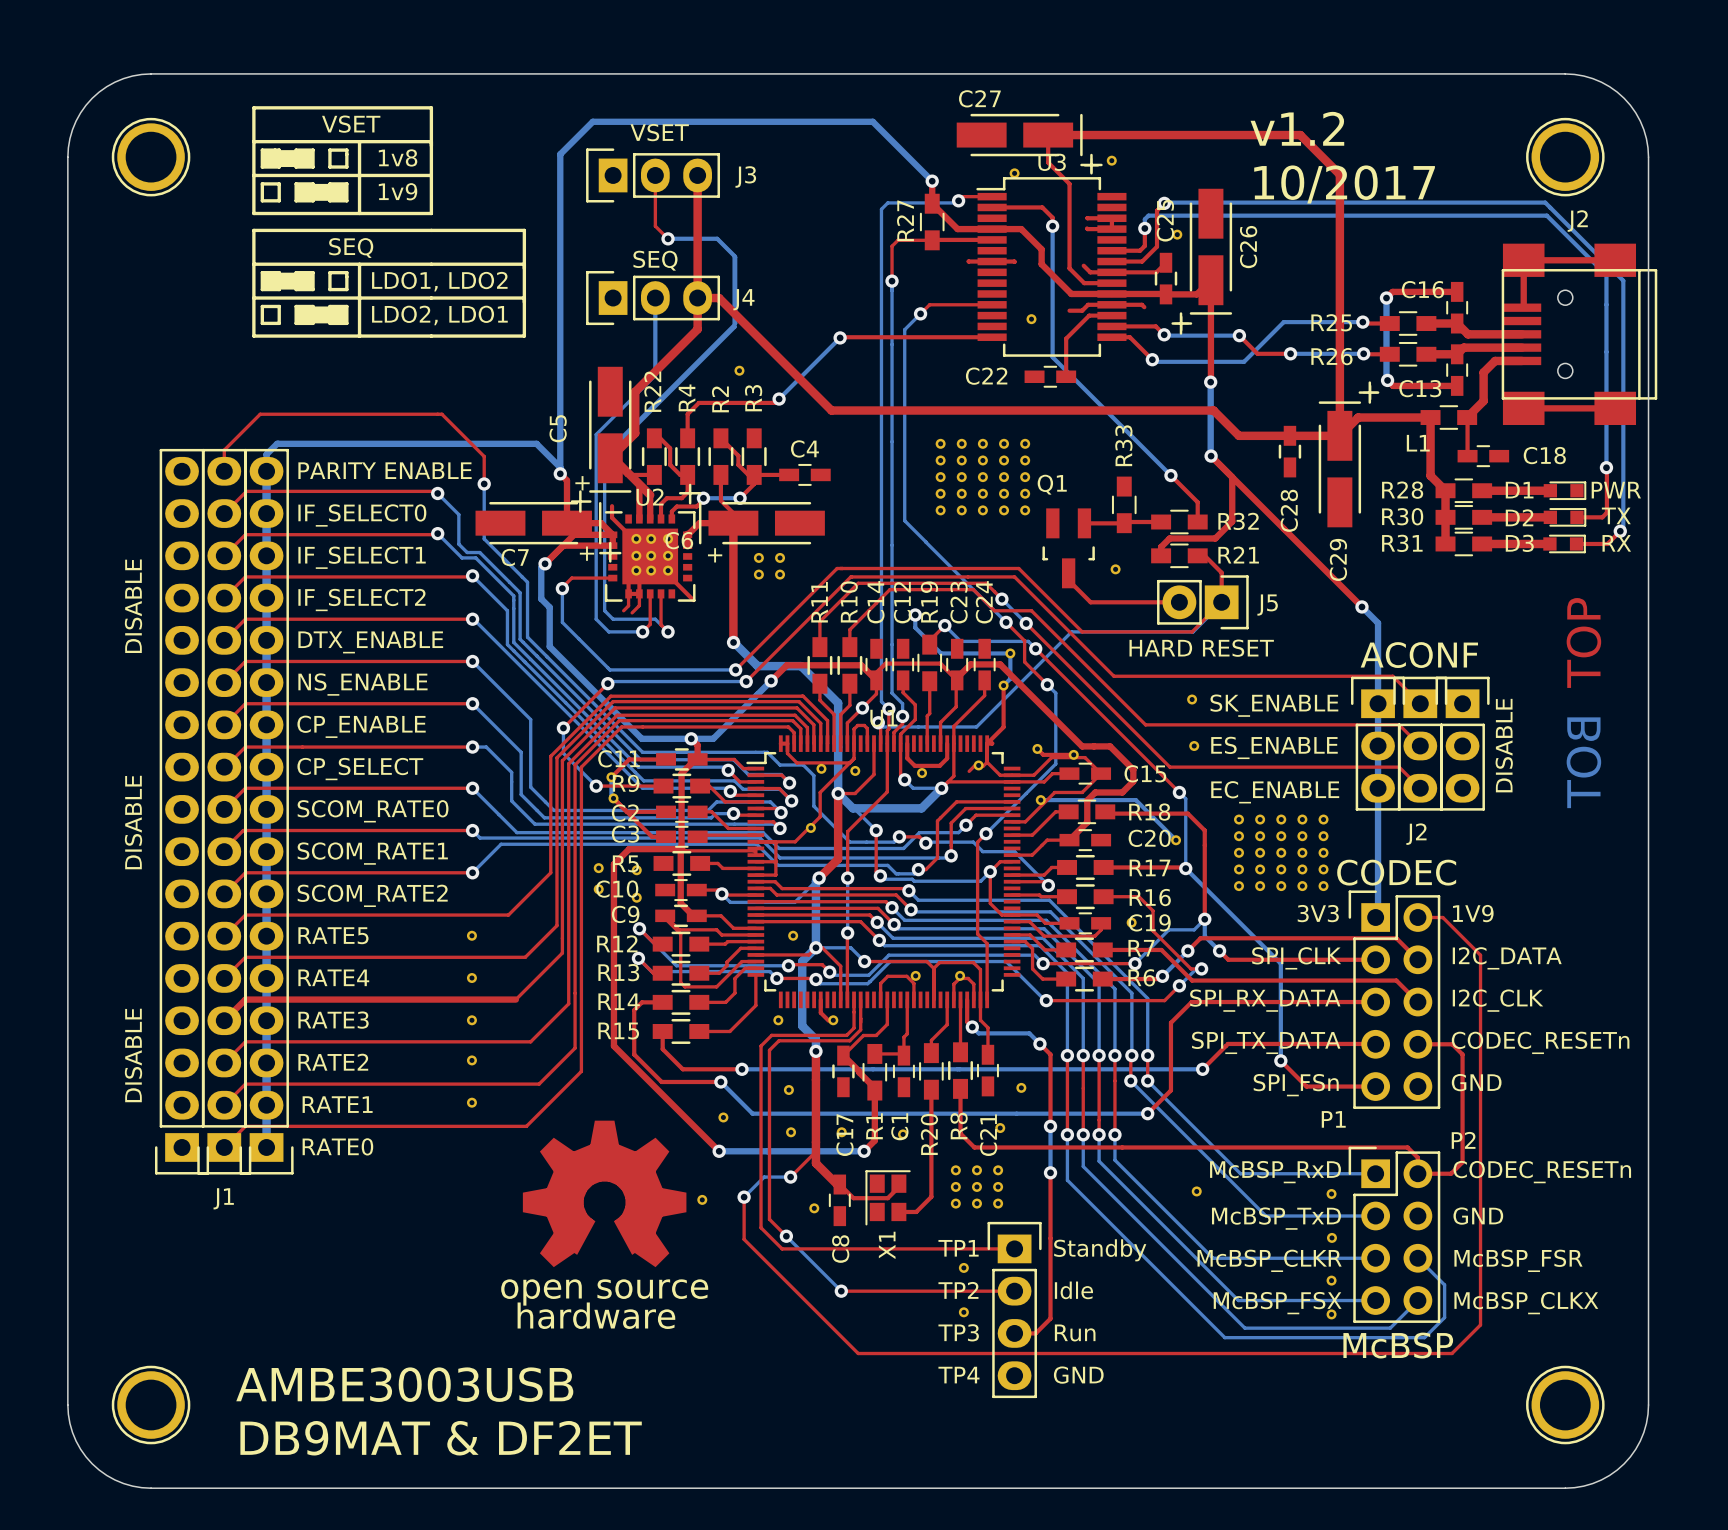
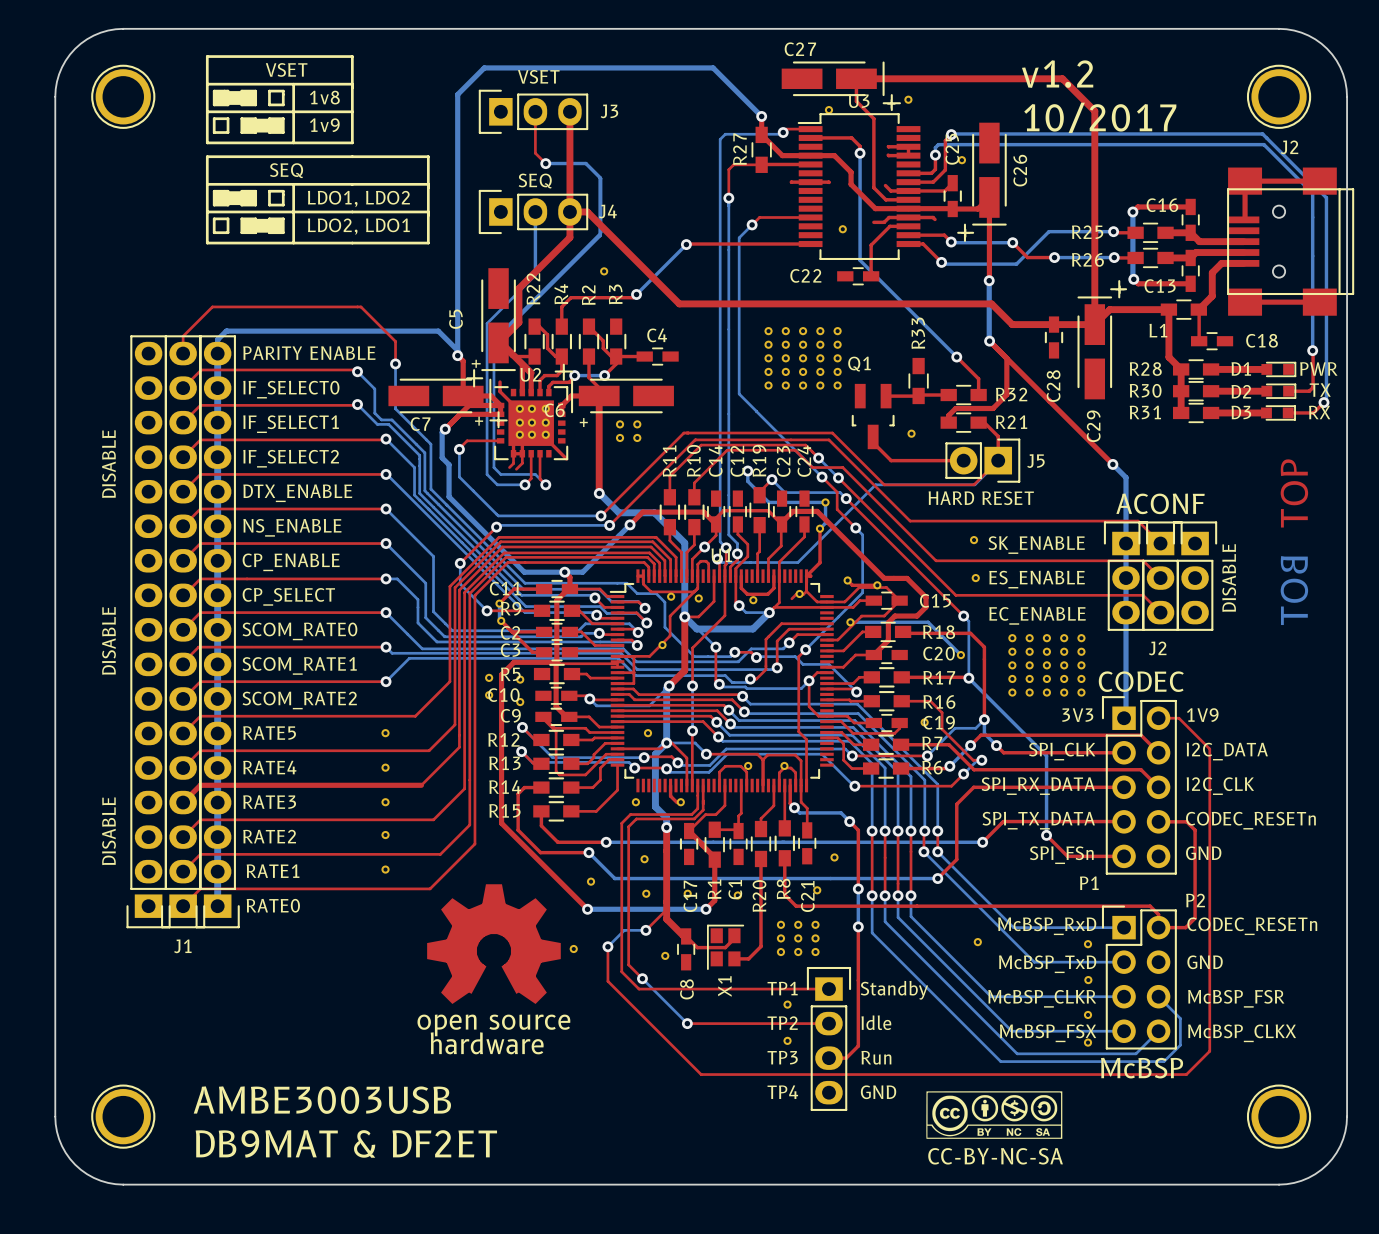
drawing: none -> [926, 1091, 1063, 1139]
text: none -> CC-BY-NC-SA (995, 1156)

